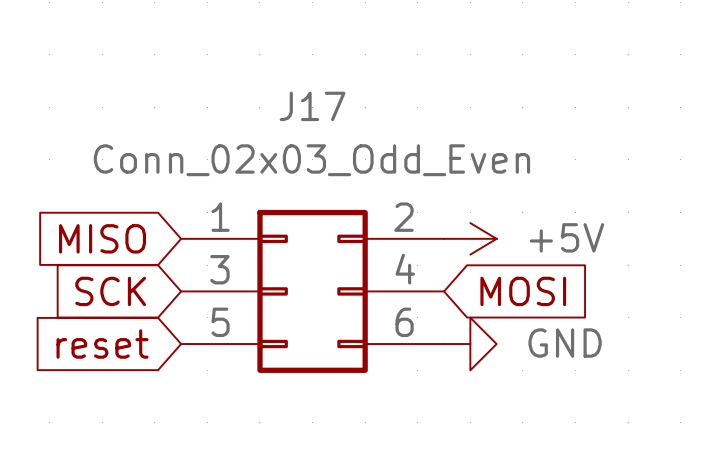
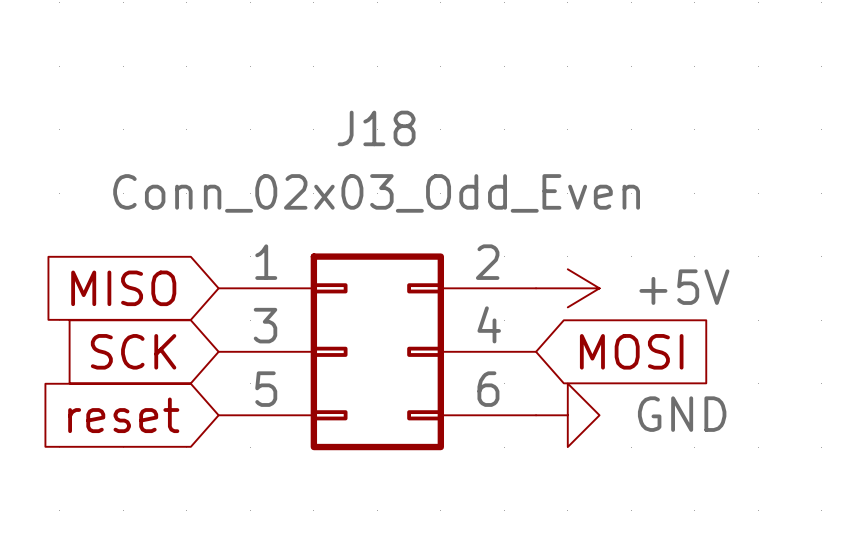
J17 name: J17 (312, 106) -> J18 (376, 128)

